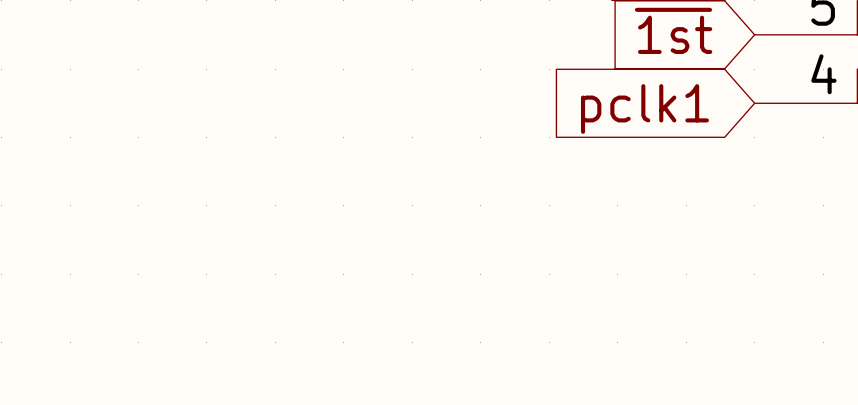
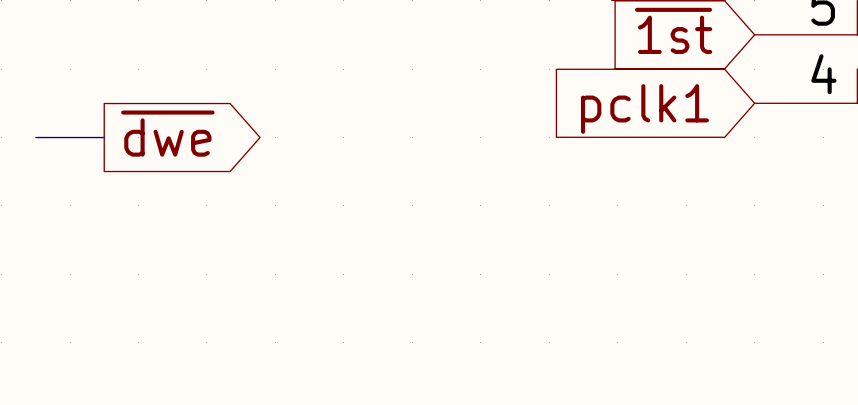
global label: none -> ~{dwe} (167, 133)
wire: none -> (35, 137) (104, 137)

